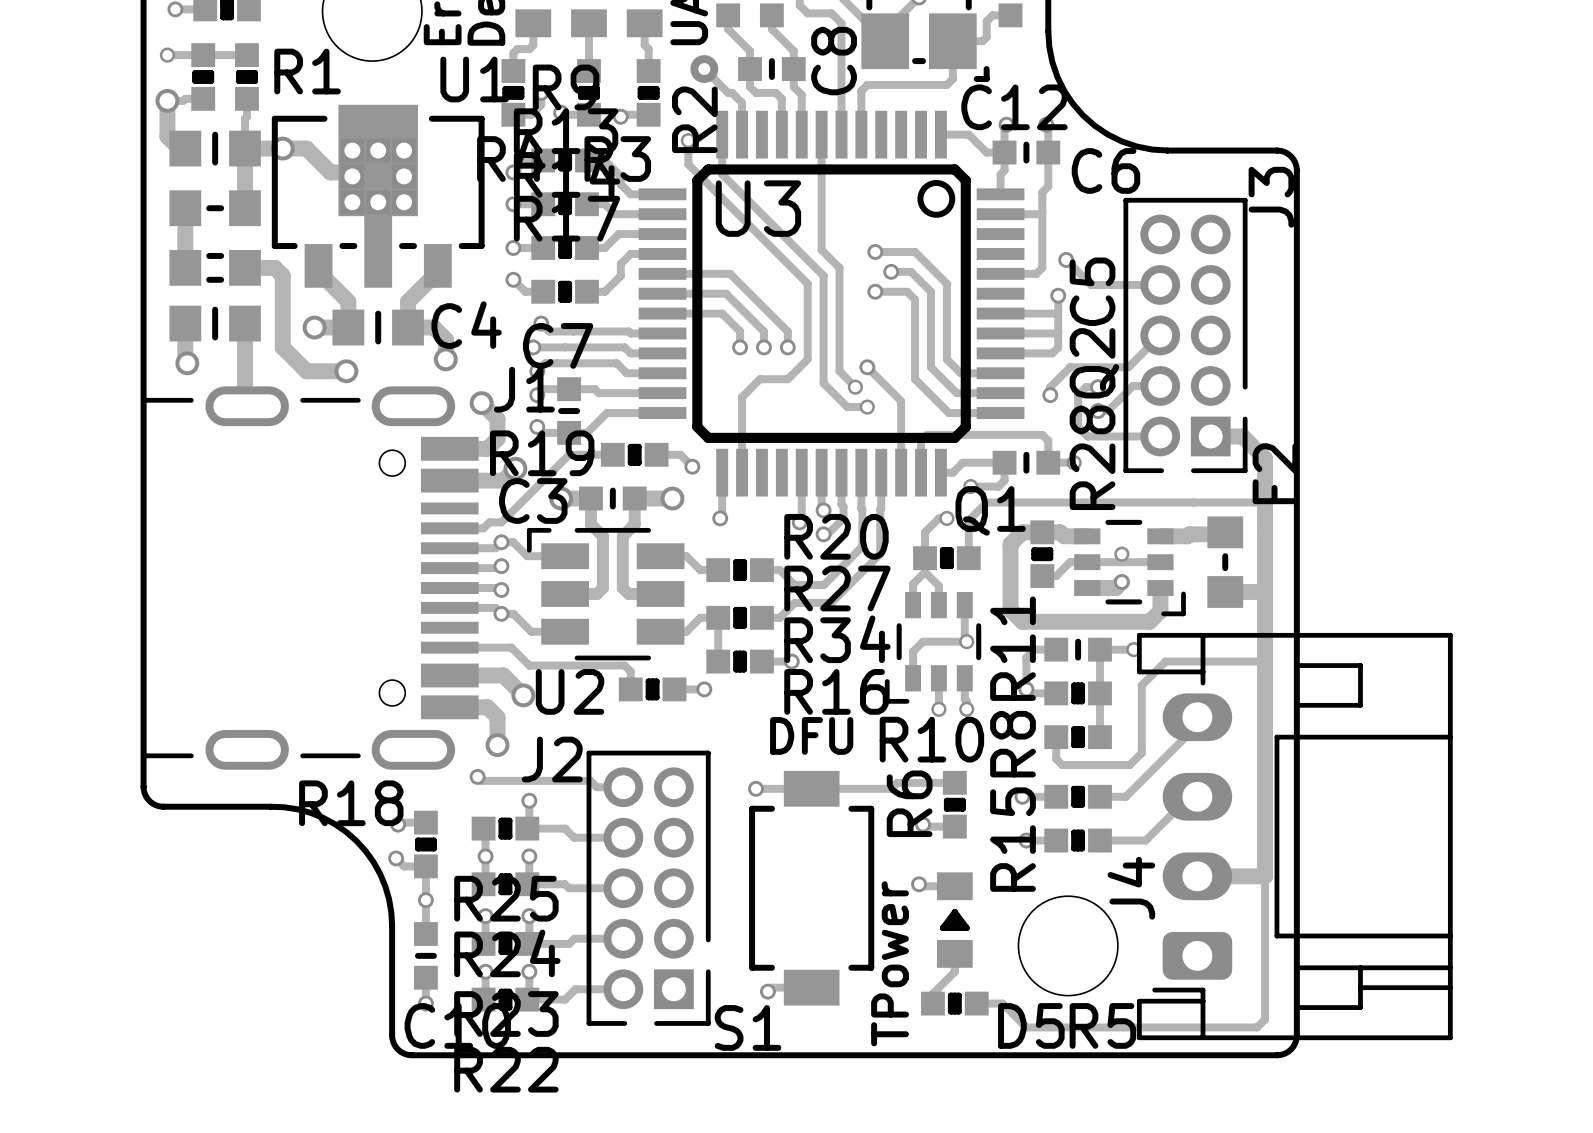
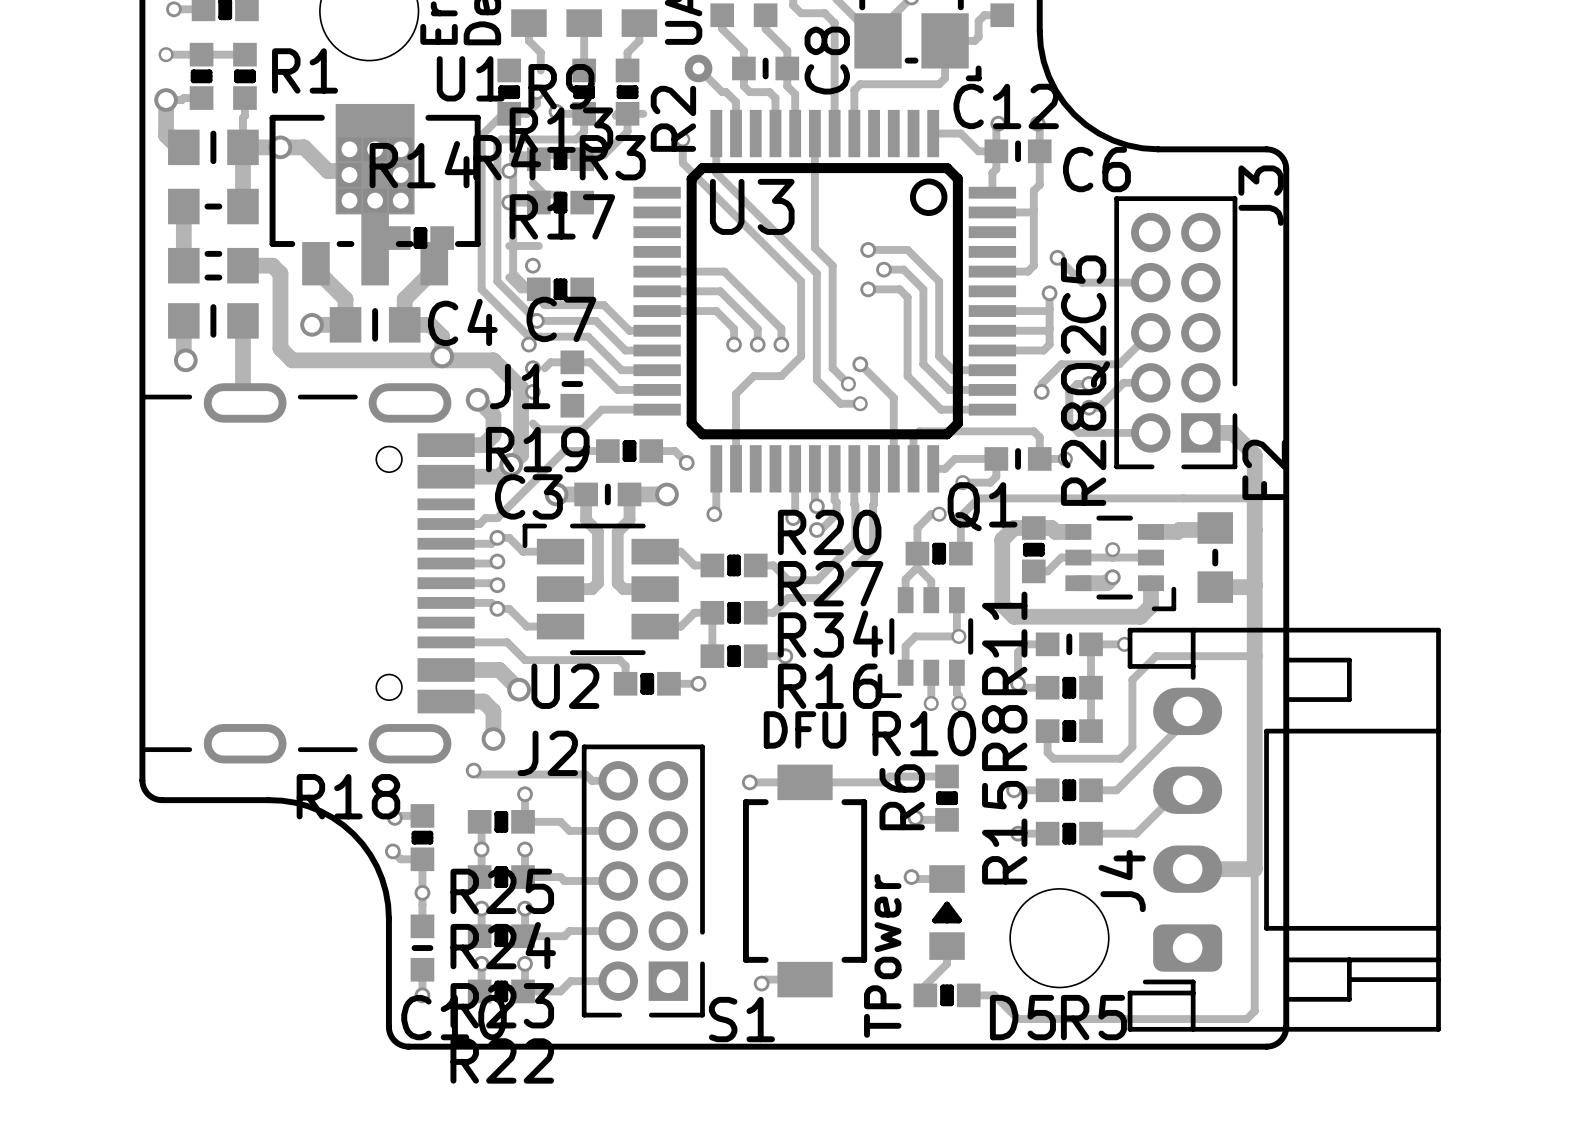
track: (533, 41) (533, 45) (529, 49) (517, 49) (513, 53) (513, 71) -> (528, 40) (540, 52) (540, 70)
track: (644, 41) (644, 45) (648, 49) (648, 71) -> (639, 40) (627, 52) (627, 70)
R2 position: (648, 92) -> (627, 92)
via: (620, 116) -> none
track: (586, 160) (604, 160) (620, 176) (620, 184) (630, 194) (662, 194) -> none
track: none -> (532, 182) (544, 194) (560, 194)
track: (586, 204) (604, 204) (614, 214) (662, 214) -> none
track: (662, 234) (618, 234) (604, 247) (586, 247) -> none
via: (513, 247) -> none
R14 position: (565, 247) -> (420, 238)
track: (662, 253) (630, 253) (620, 263) (620, 275) (604, 291) (586, 291) -> none
via: none -> (532, 265)
via: (513, 279) -> none
track: (541, 323) (549, 331) (628, 331) (634, 333) -> (627, 113) (627, 131) (603, 155) (513, 155) (513, 273) (544, 305) (603, 305) (629, 330)
track: (282, 347) (306, 371) (346, 371) -> (280, 344) (280, 348) (292, 360) (493, 360) (521, 387) (521, 455) (511, 464)
track: (533, 347) (624, 347) -> (584, 113) (584, 131) (576, 139) (501, 139) (497, 143) (497, 281) (536, 320) (596, 320) (619, 344)
track: (616, 363) (545, 363) (537, 371) -> (611, 360) (588, 336) (528, 336) (481, 289) (481, 135) (503, 113) (509, 113)
via: (346, 371) -> none
track: (622, 393) (598, 393) (594, 389) (543, 389) (537, 395) -> (617, 389) (590, 362) (550, 362) (544, 368)
C7 position: (569, 411) -> (572, 384)
via: (537, 426) -> none

